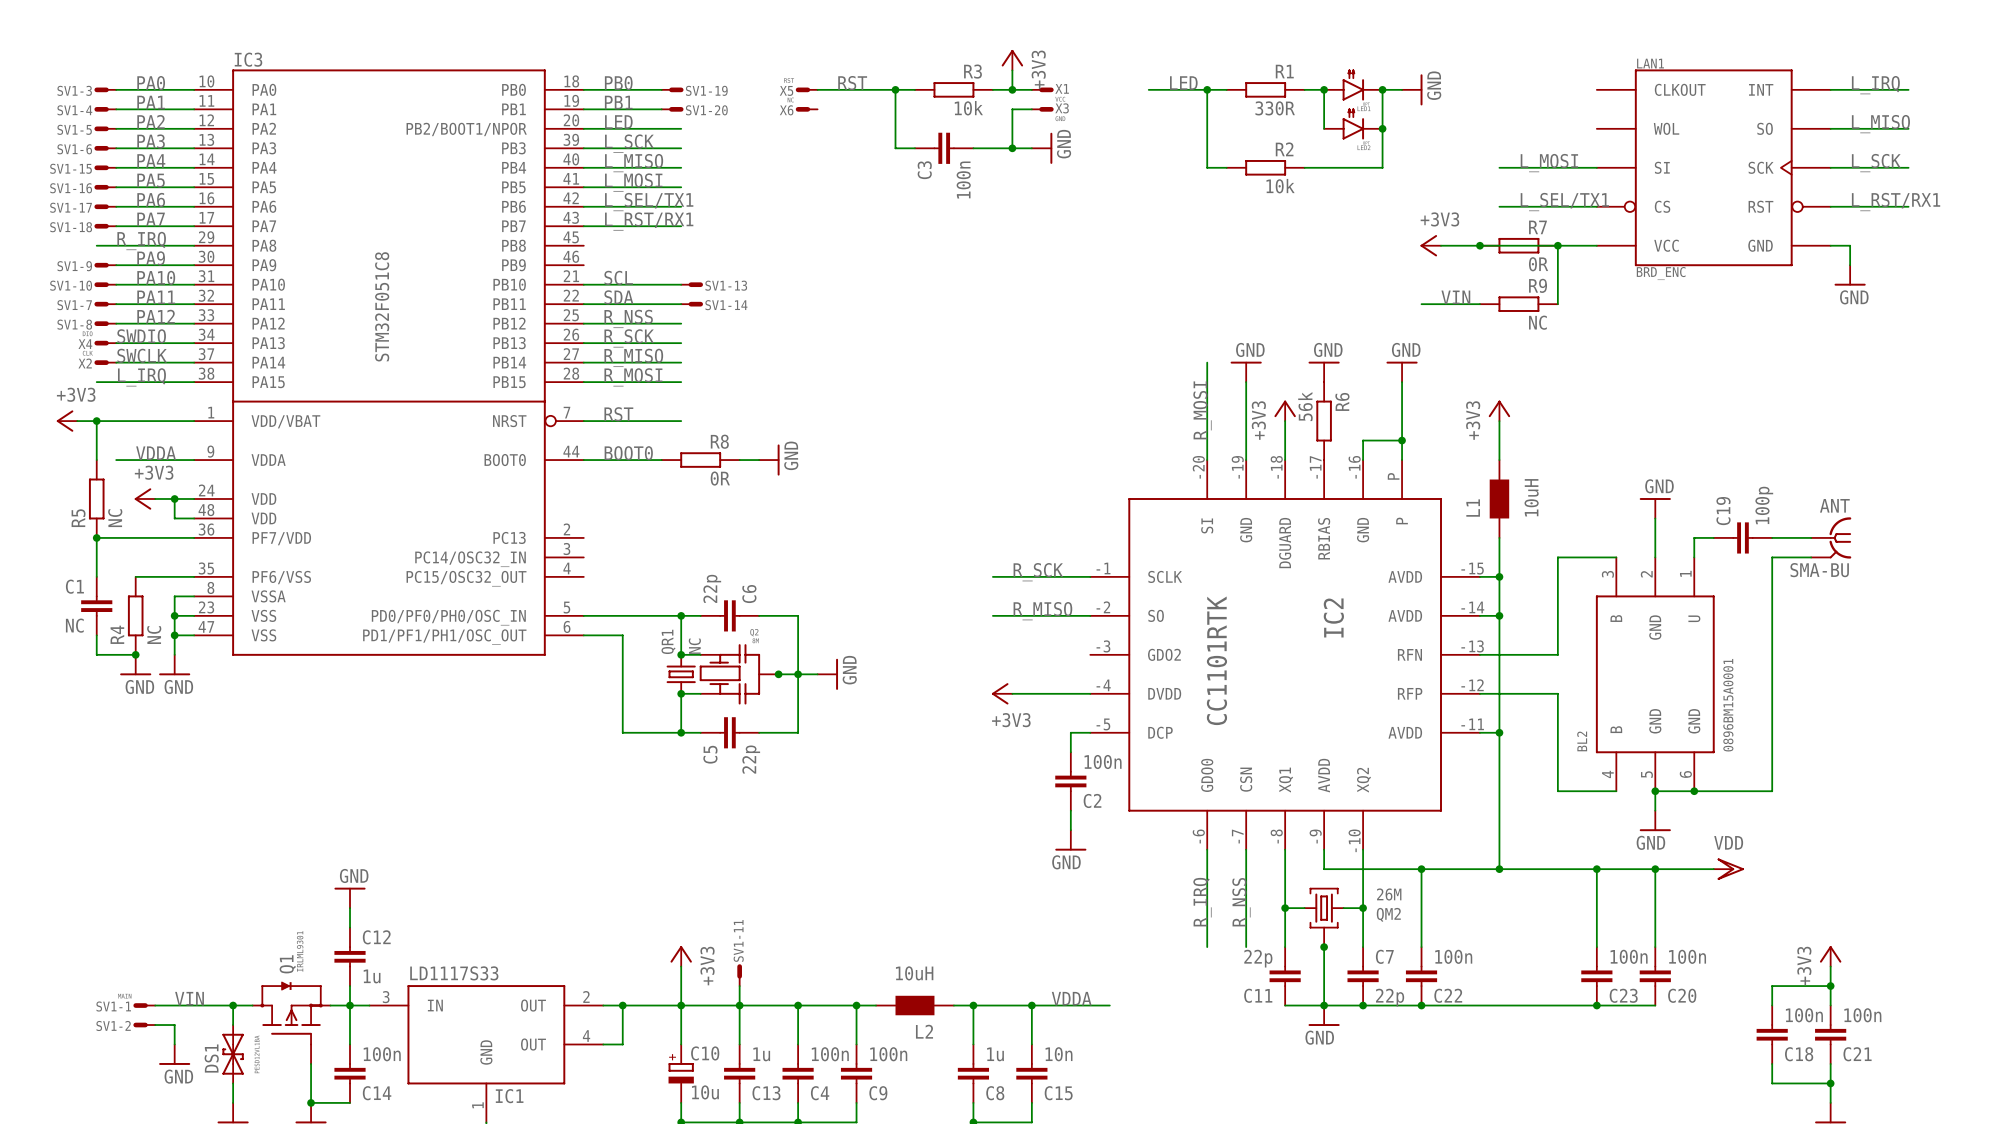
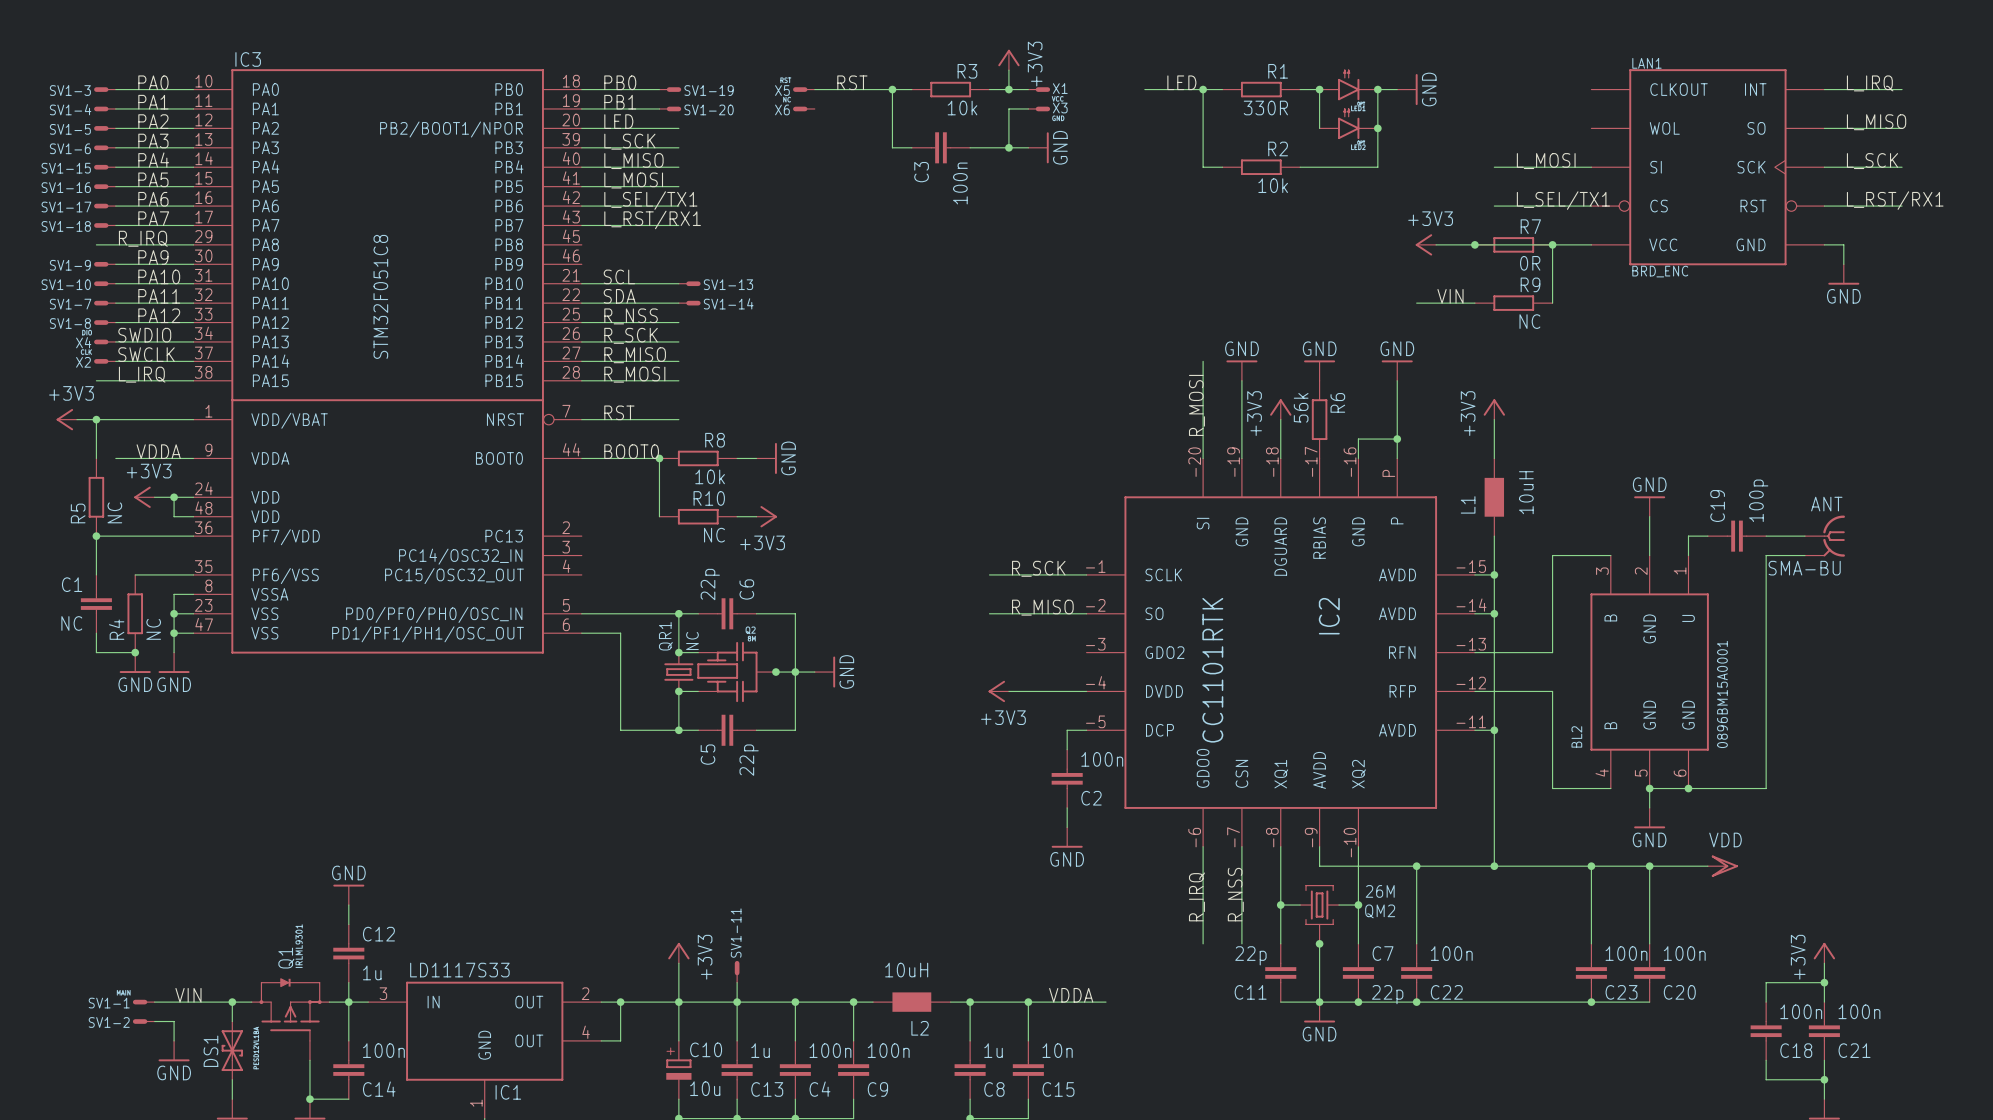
wire: none -> (659, 458) (659, 516)
junction: none -> (659, 458)
R8 value: 0R (720, 478) -> 10k (710, 476)
R10: none -> NC (698, 516)
wire: none -> (737, 516) (756, 516)
power symbol: none -> +3V3 (766, 516)

